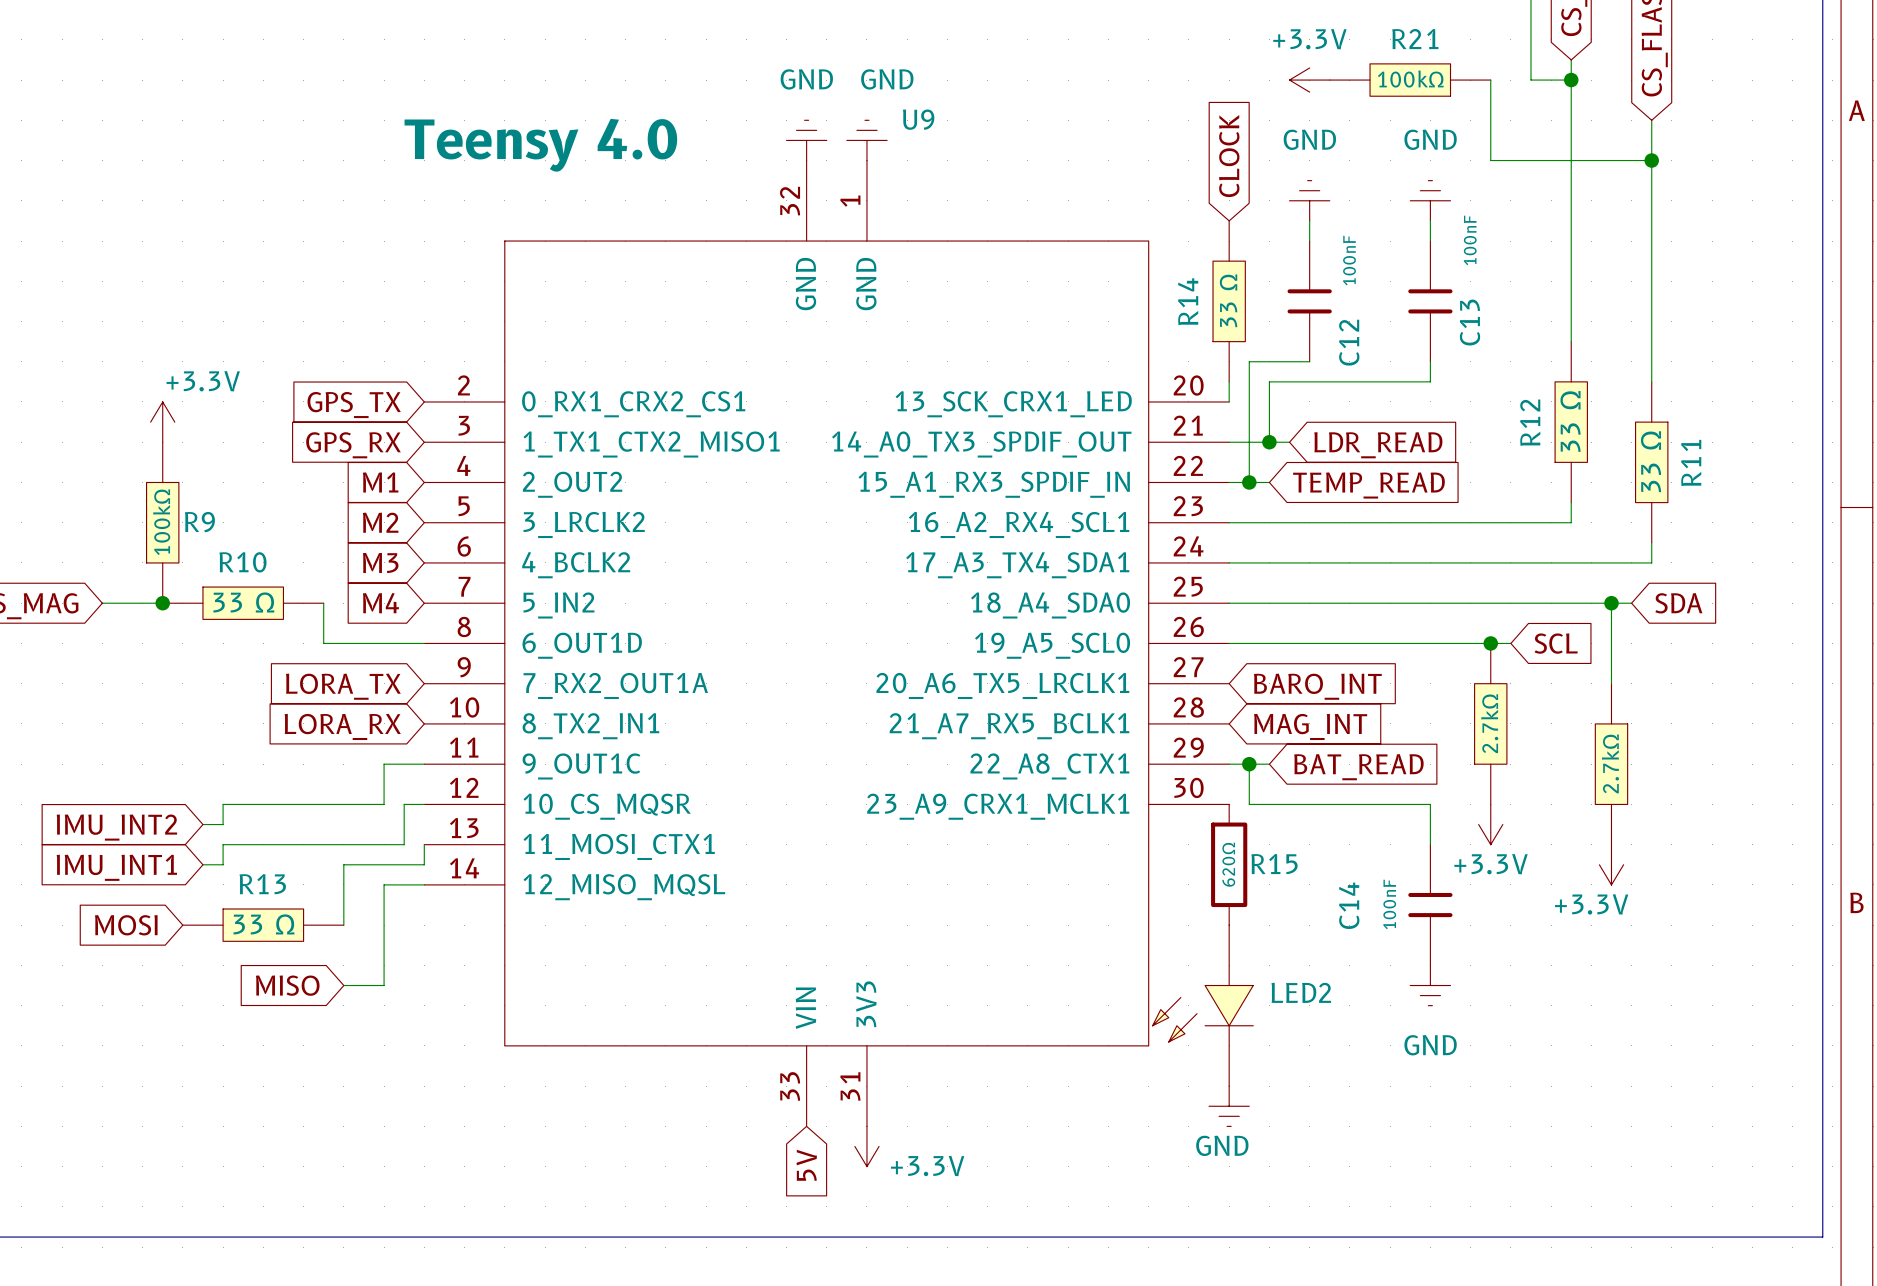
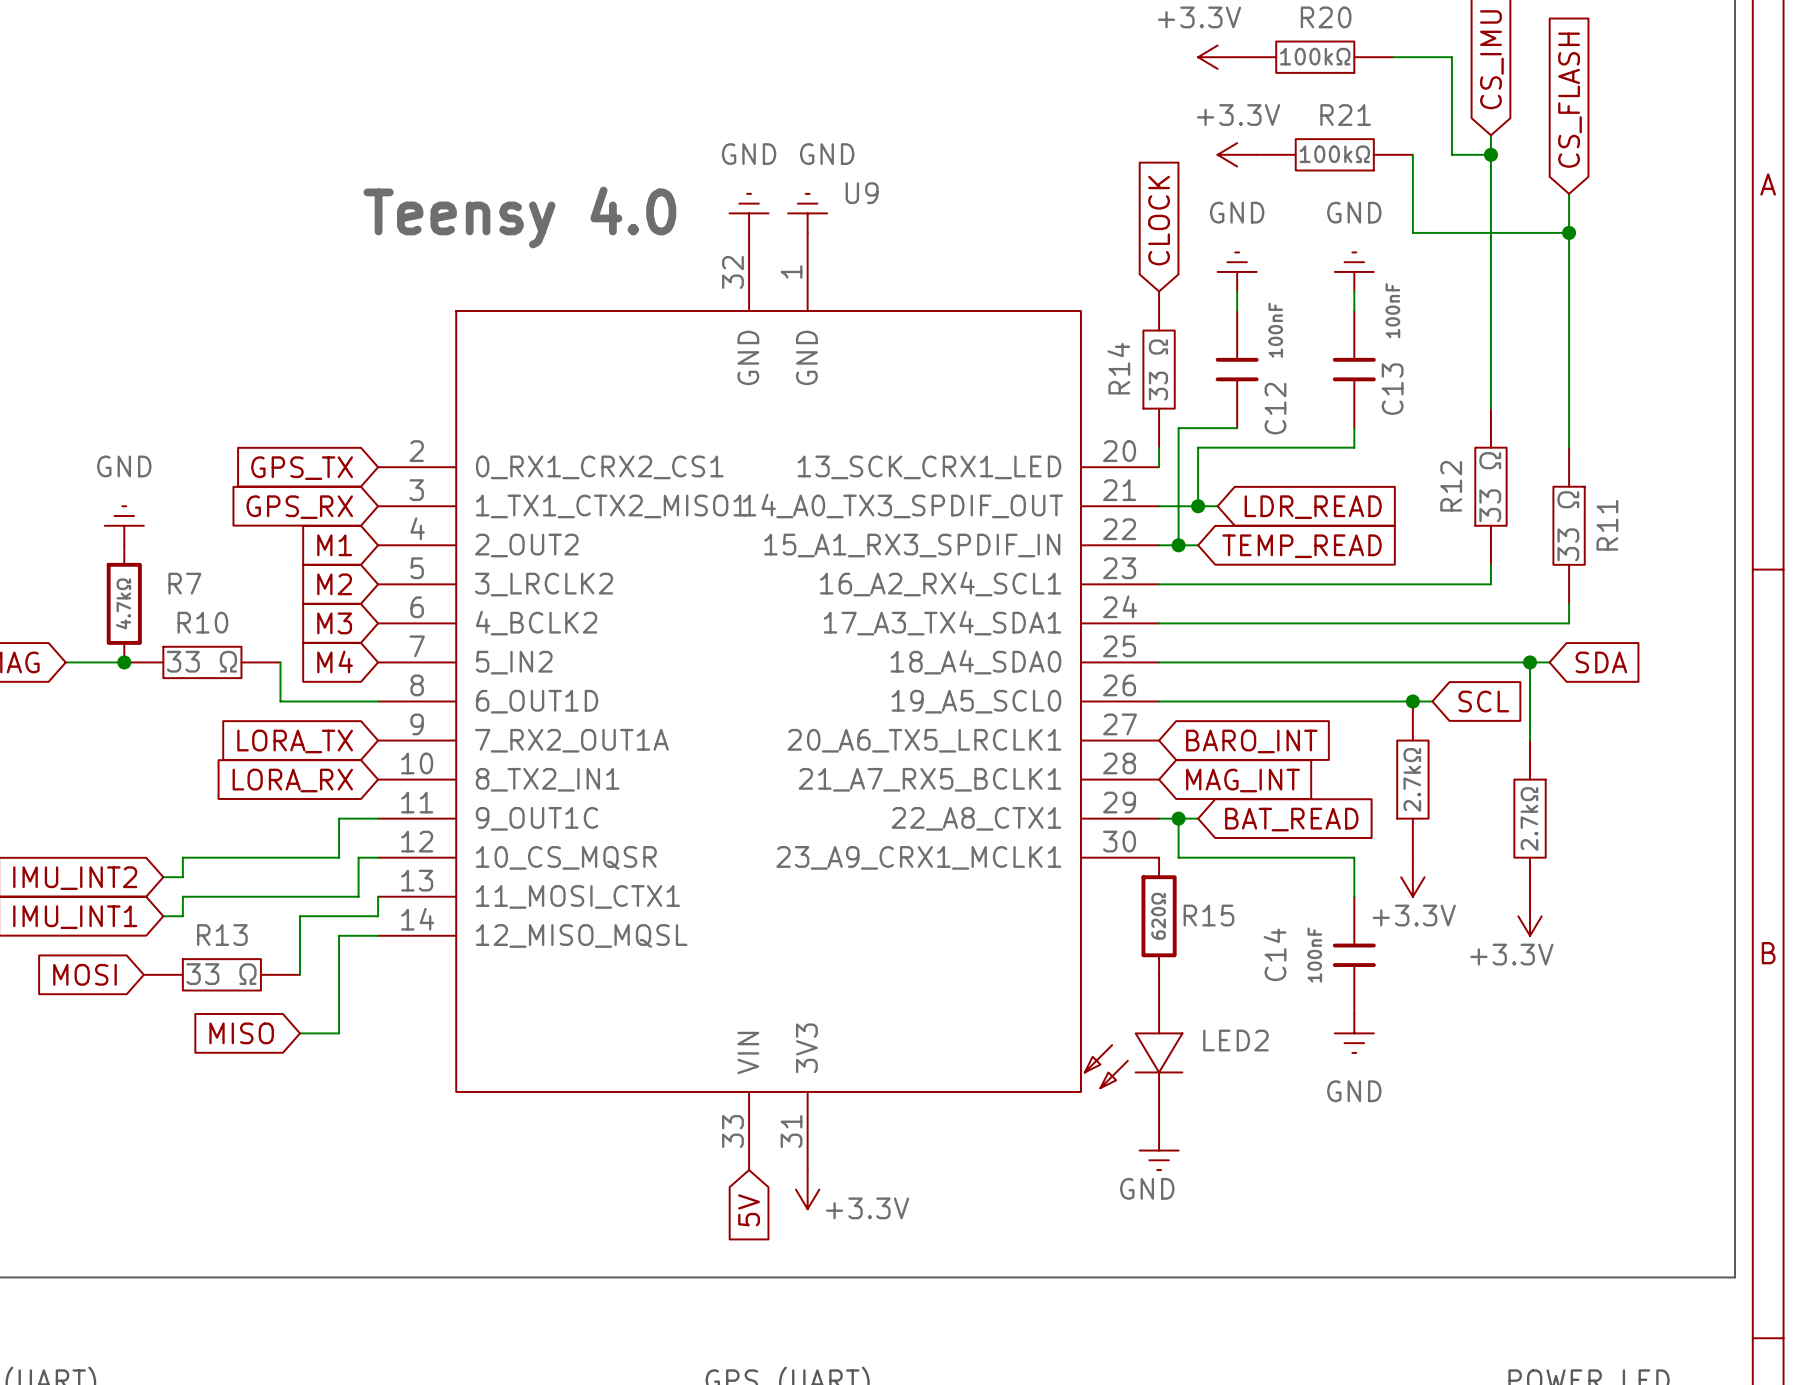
power symbol: +3.3V (162, 422) -> none
power symbol: none -> GND (124, 525)
R9: (162, 522) -> none
R7: none -> 4.7kΩ (124, 603)

